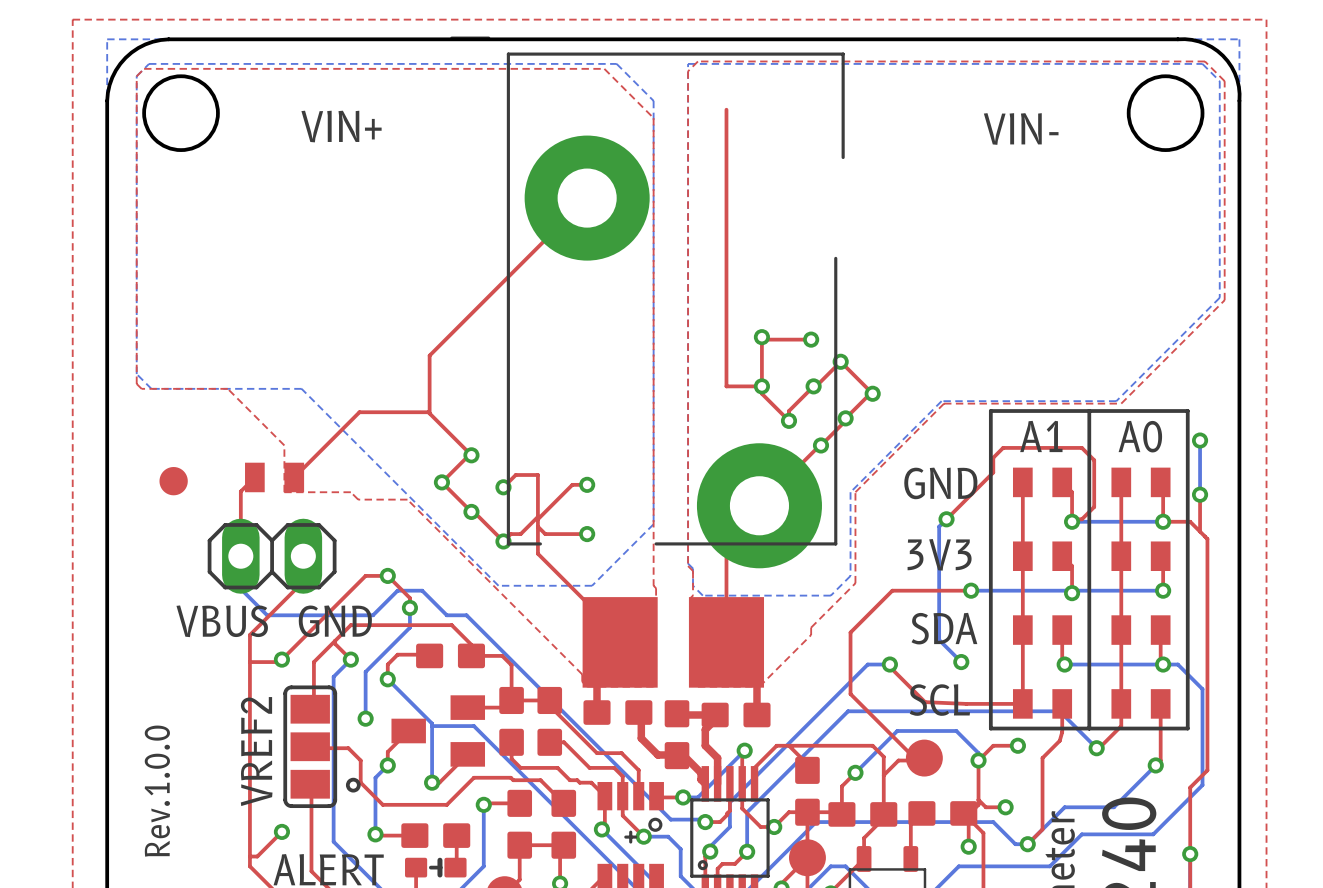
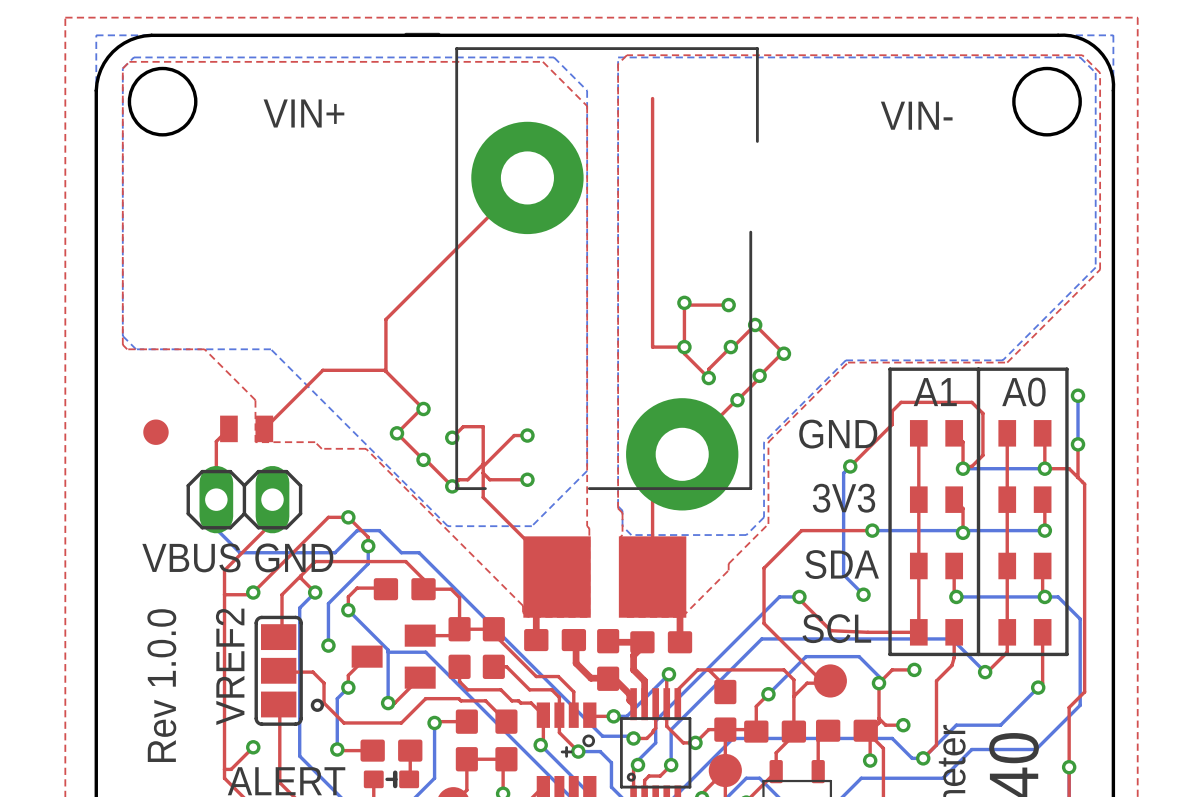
text: Rev.1.0.0 (157, 791) -> Rev 1.0.0 (161, 685)

